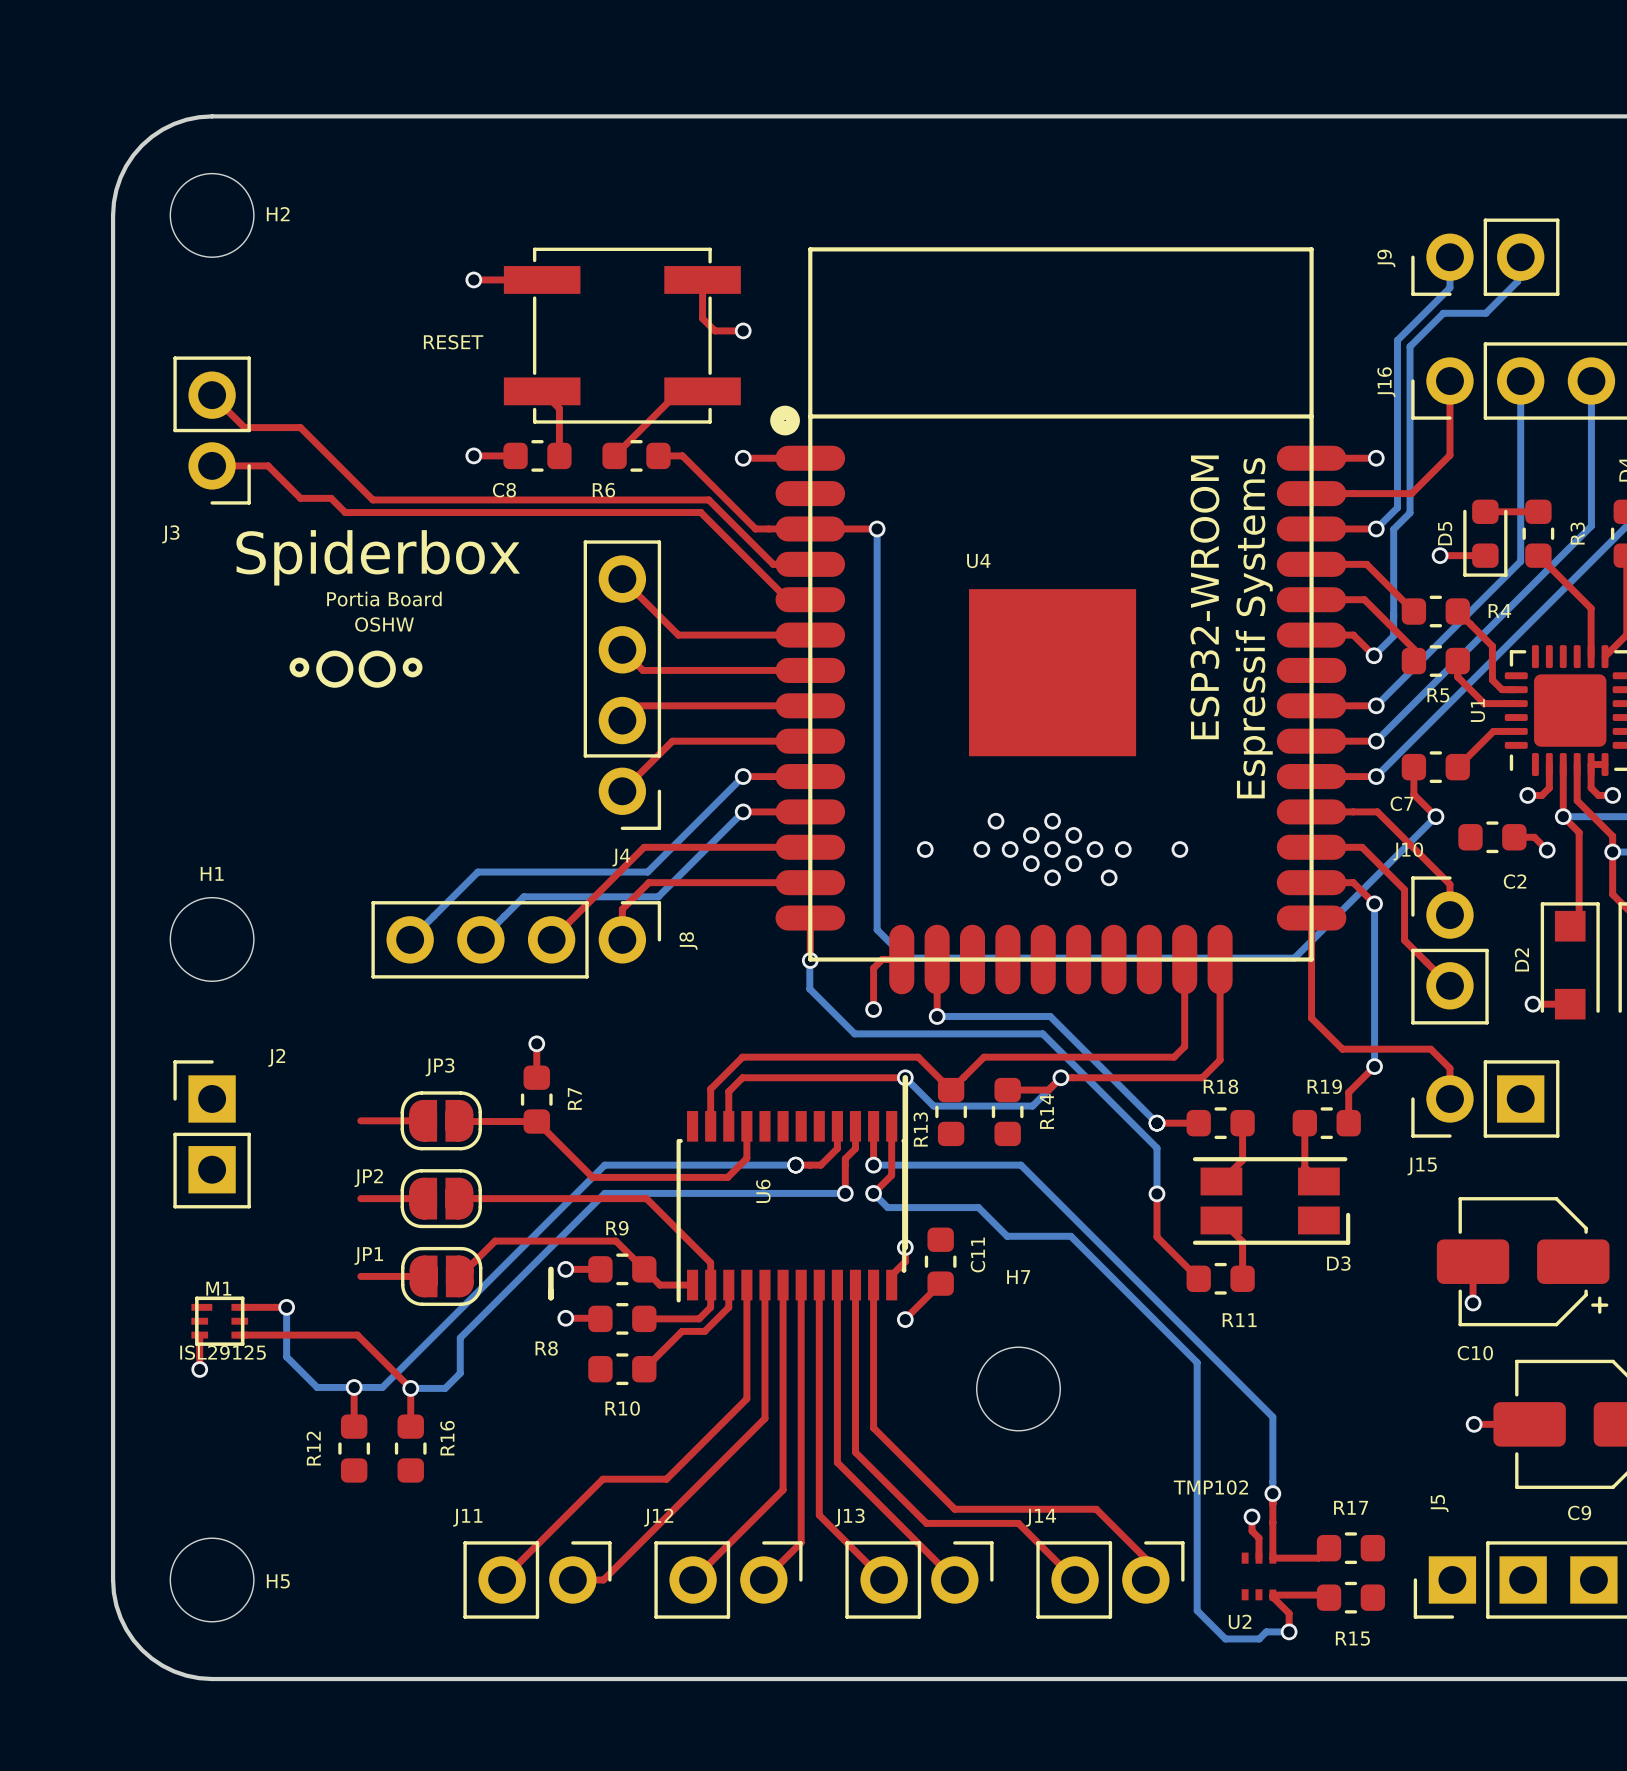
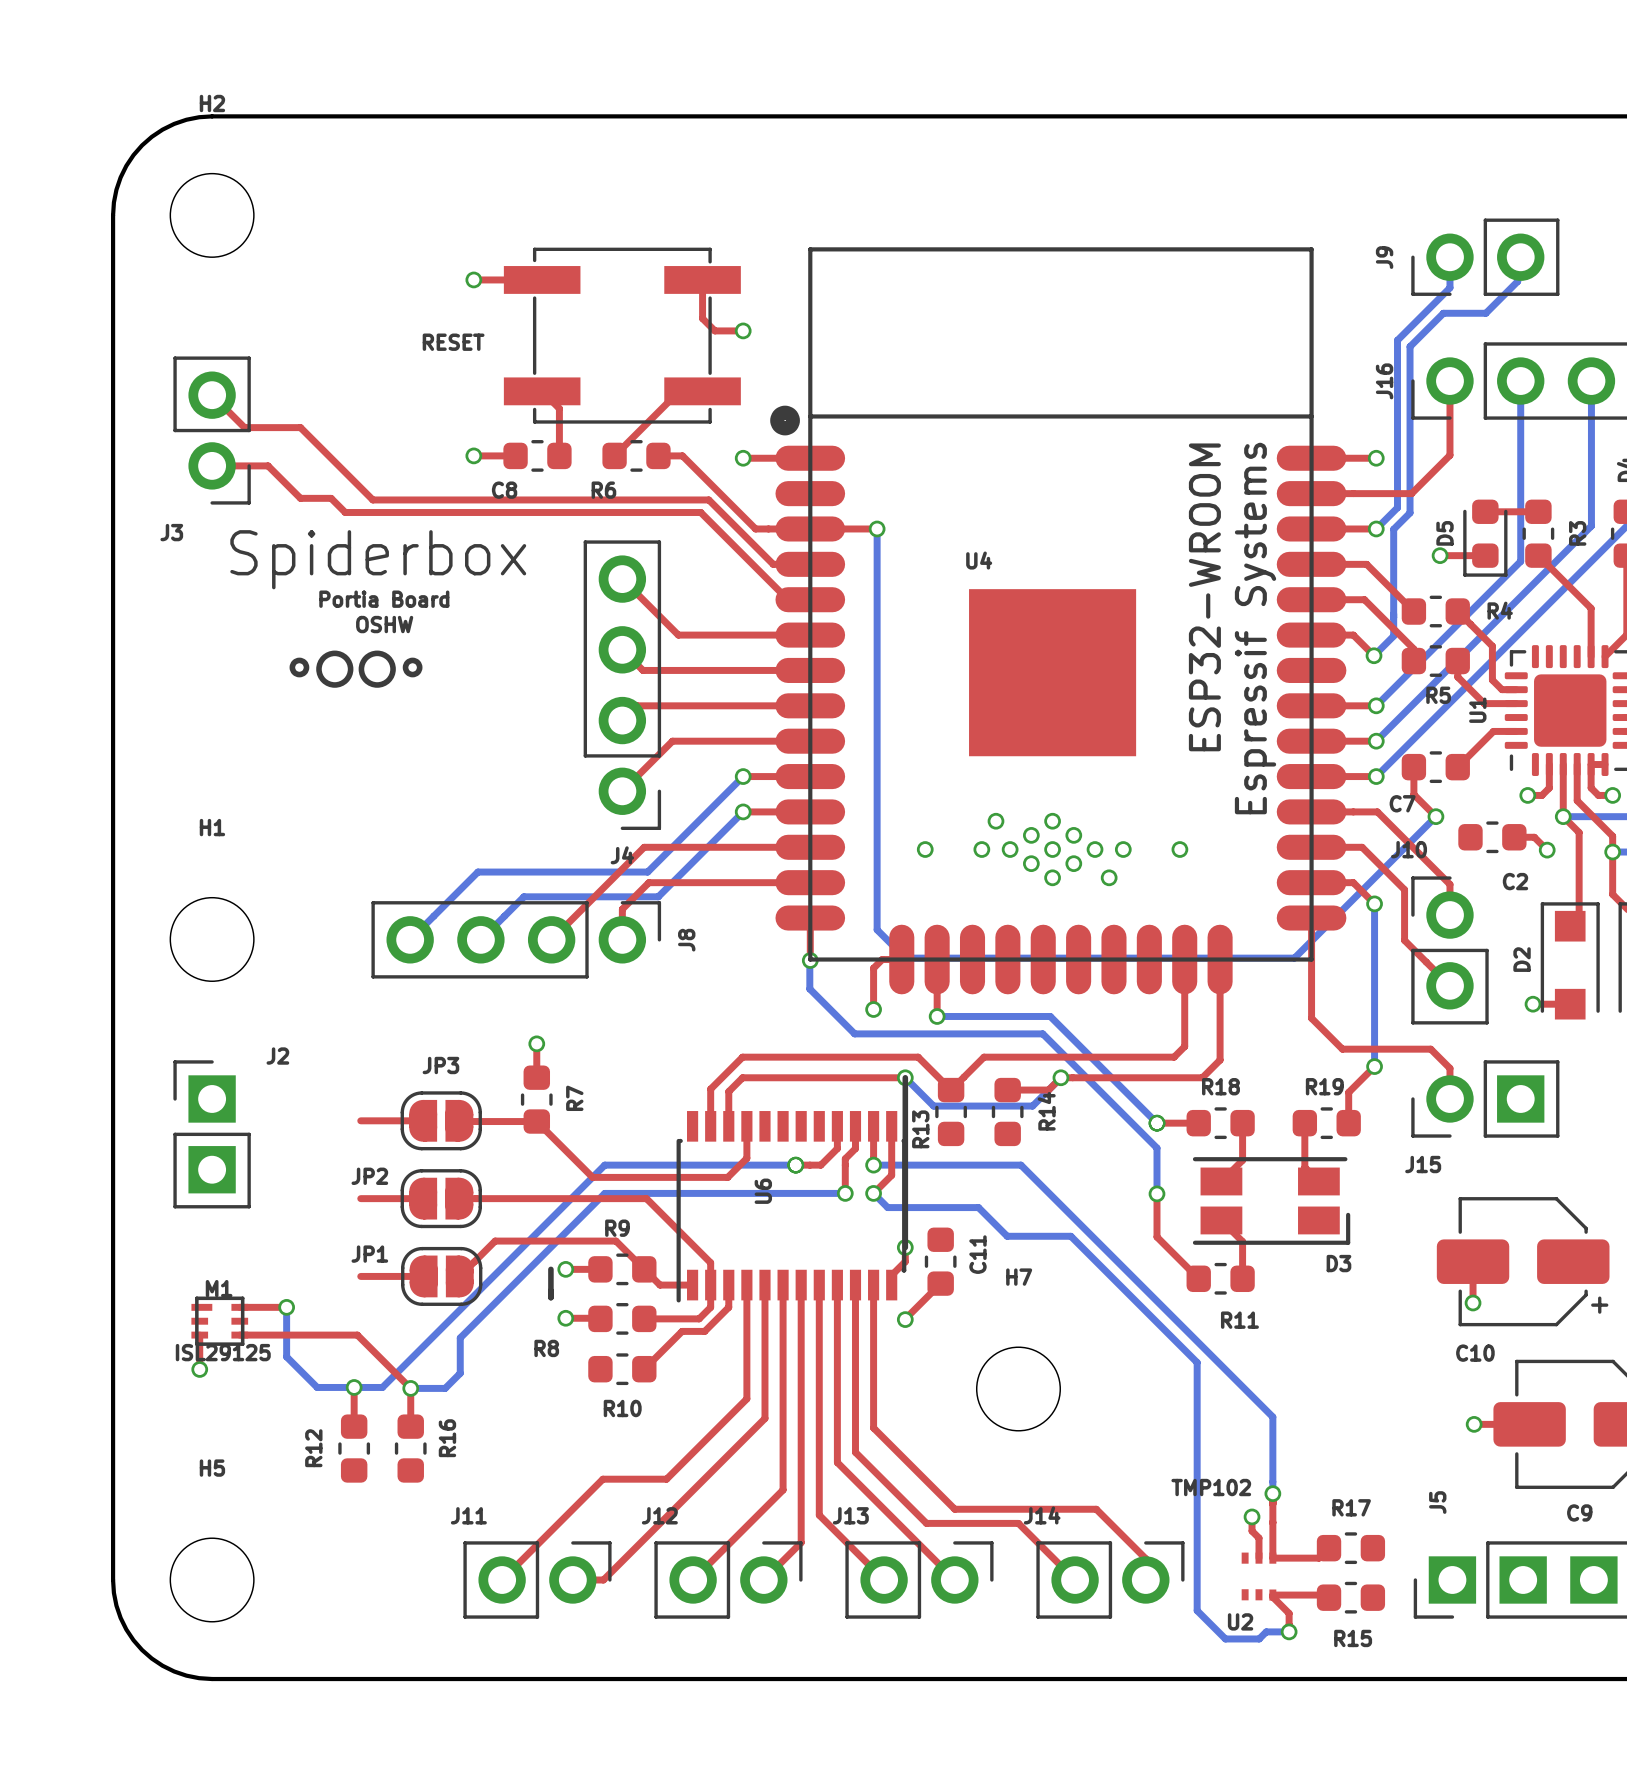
H2 name position: H2 (278, 214) -> H2 (212, 103)
H1 name position: H1 (212, 873) -> H1 (212, 827)
H5 name position: H5 (278, 1581) -> H5 (212, 1468)

